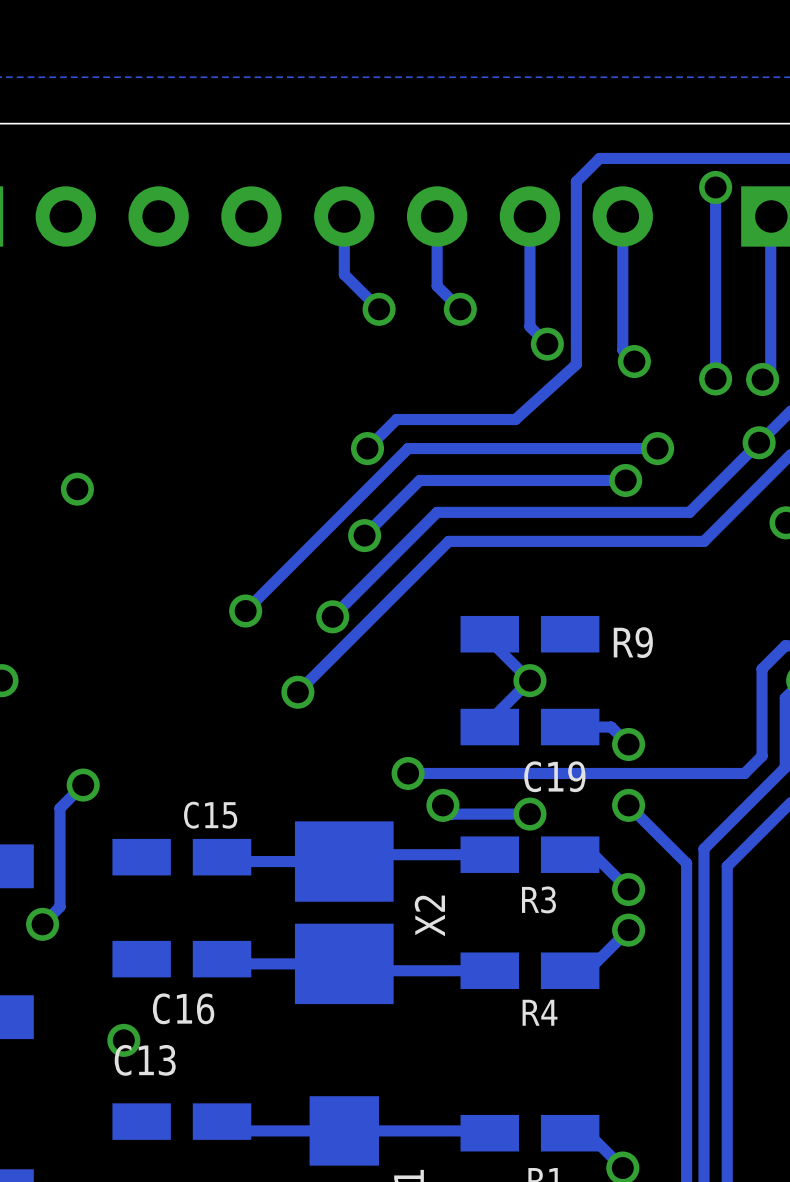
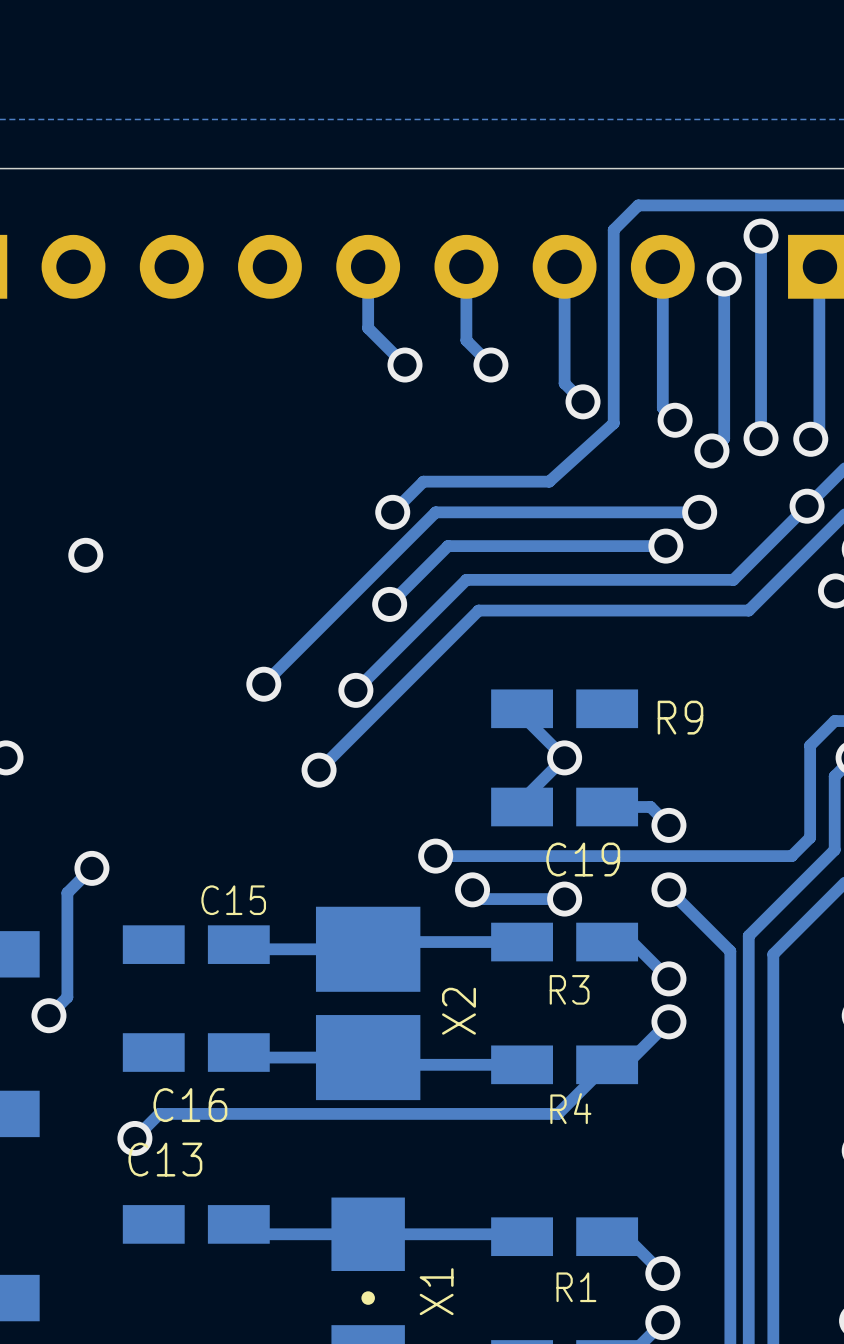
track: none -> (724, 279) (724, 438) (711, 450)
via: none -> (724, 279)
via: none -> (711, 450)
track: none -> (607, 1064) (558, 1113) (159, 1113) (134, 1138)

